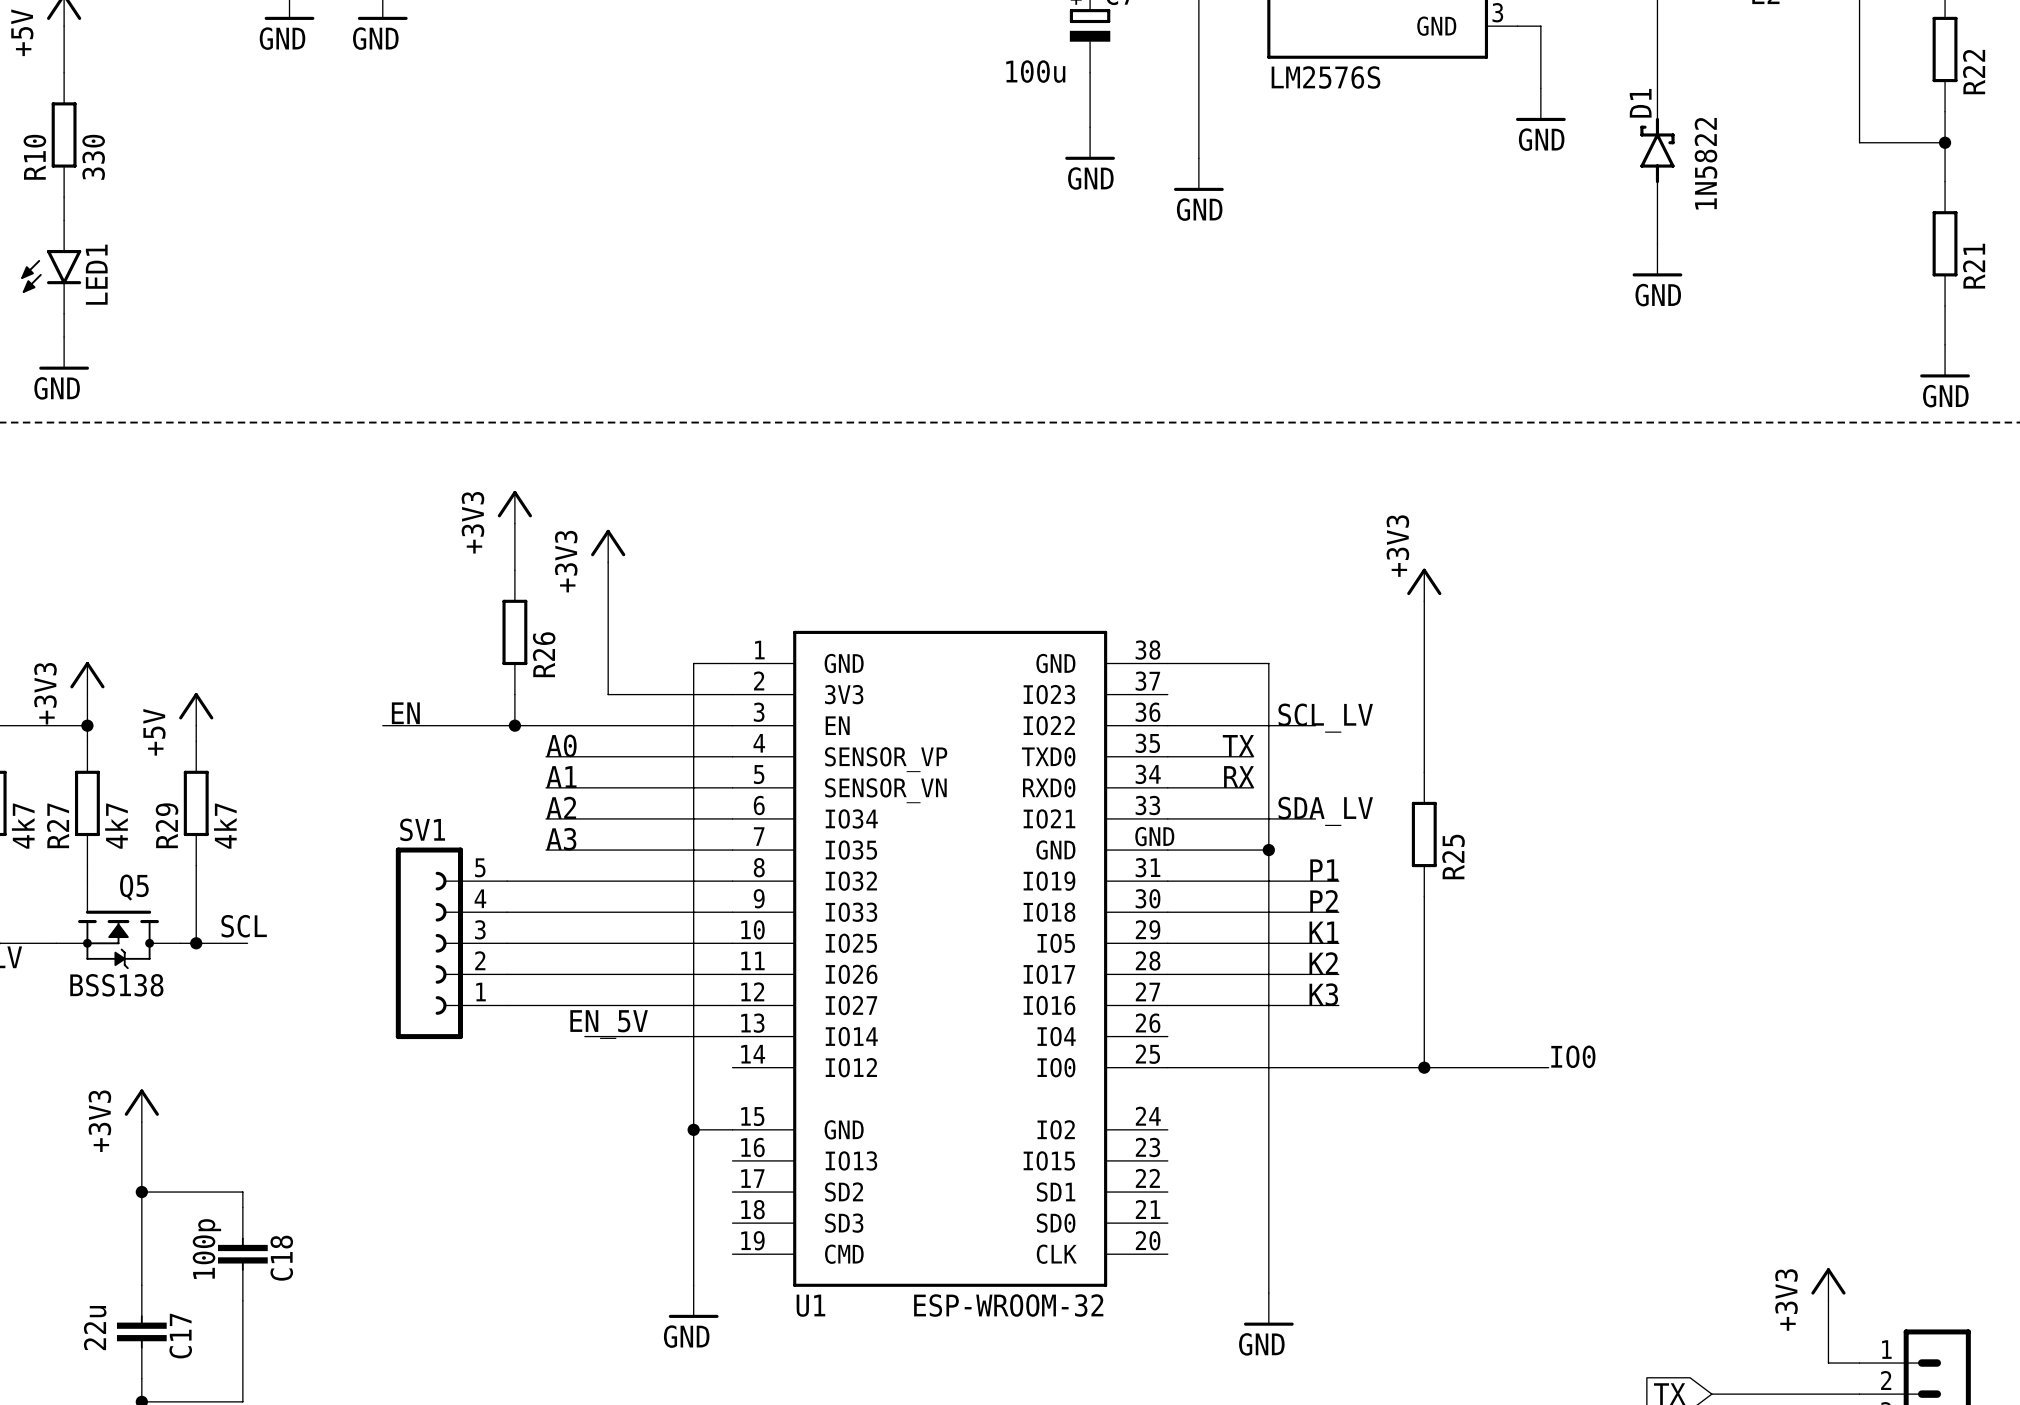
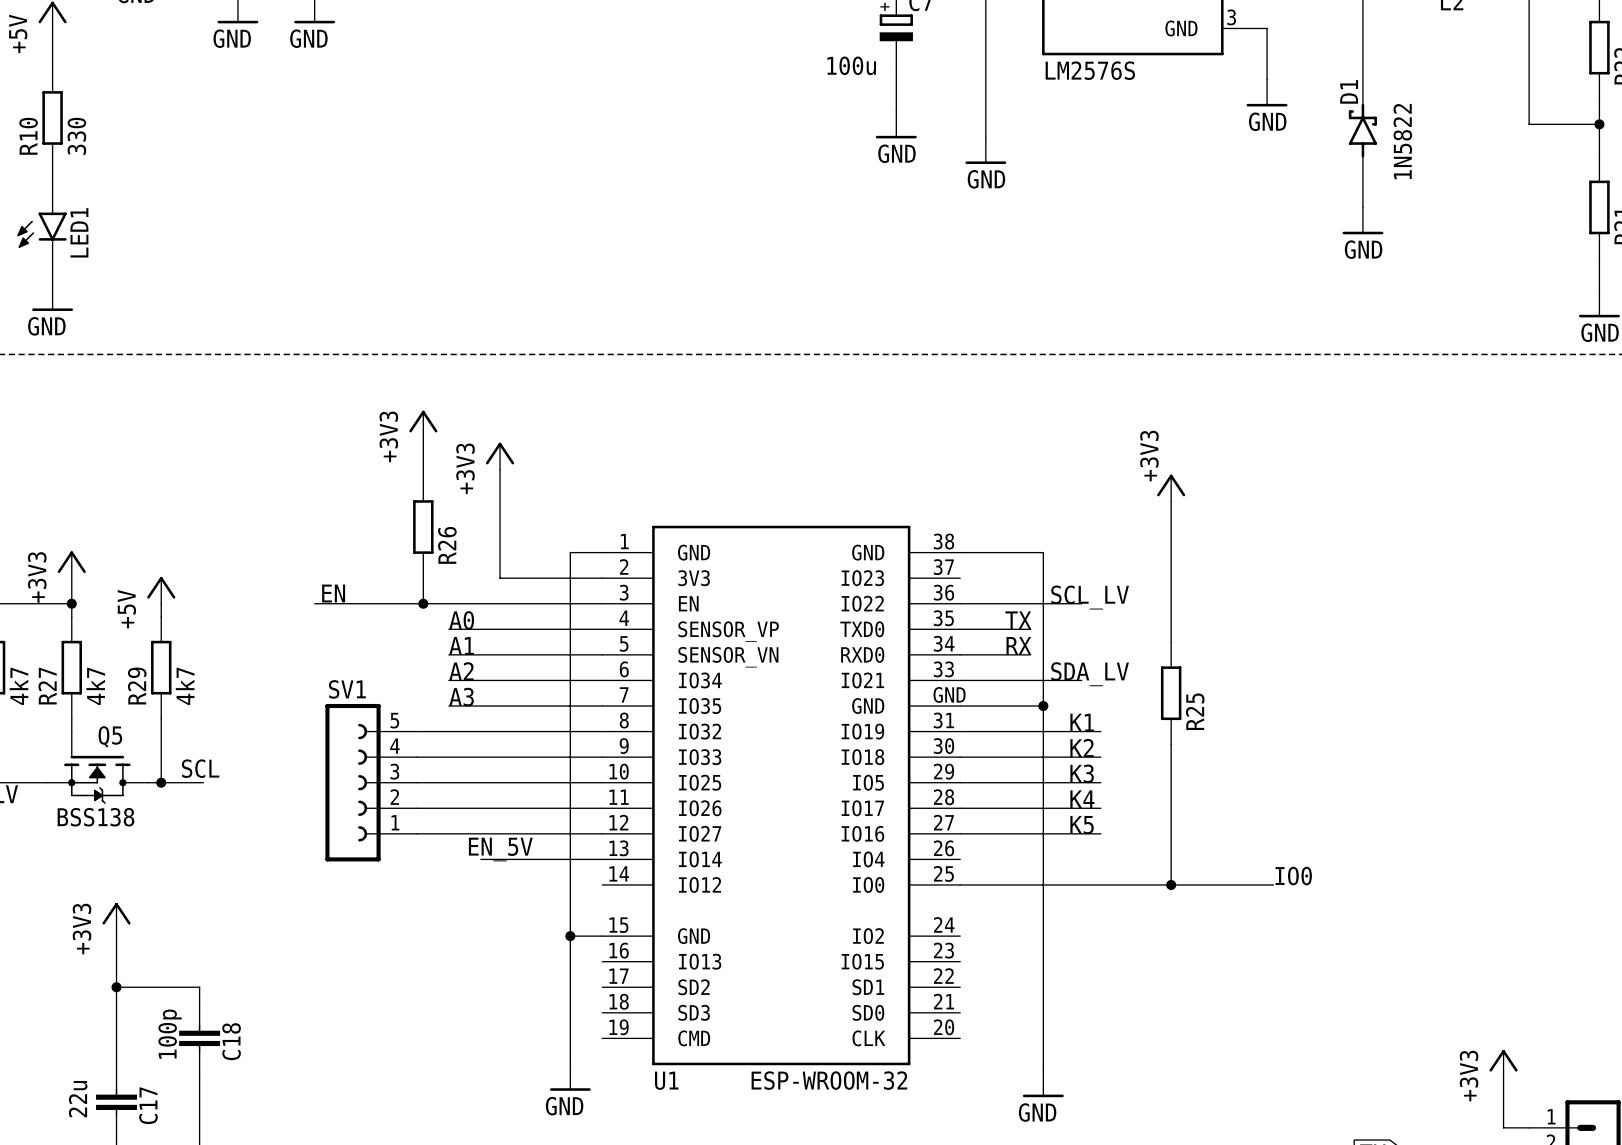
label: P1 (1324, 870) -> K1 (1082, 722)
label: P2 (1324, 901) -> K2 (1082, 748)
label: K1 (1323, 932) -> K3 (1082, 773)
label: K2 (1323, 963) -> K4 (1082, 799)
label: K3 (1323, 994) -> K5 (1082, 825)

